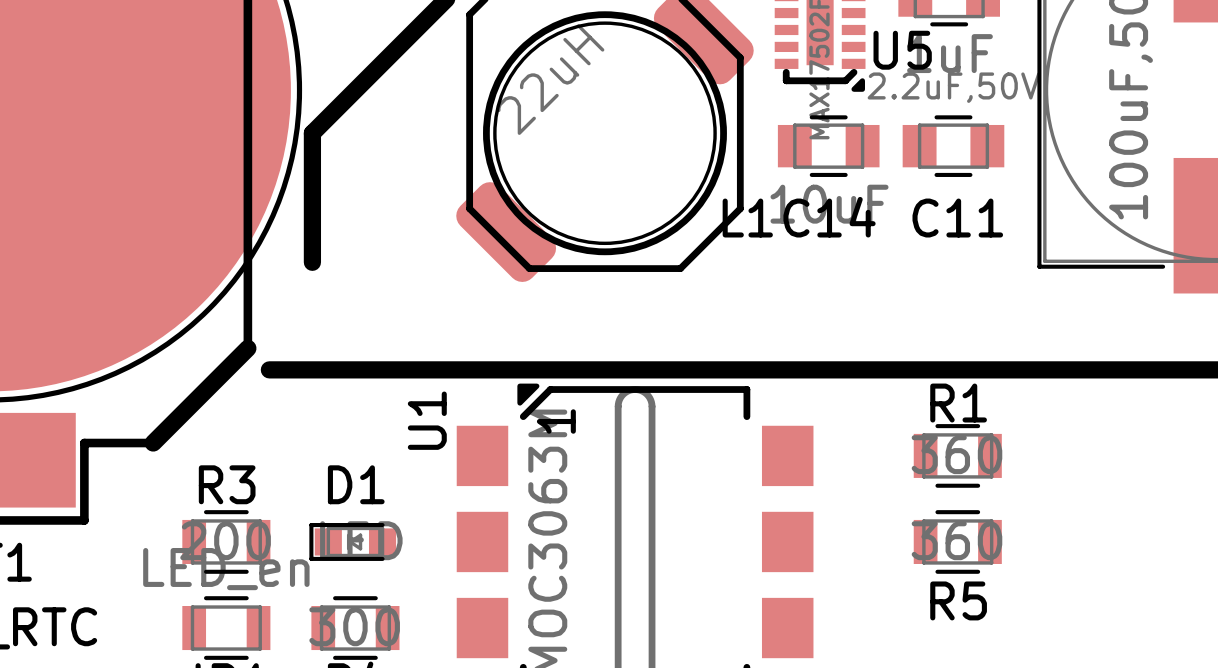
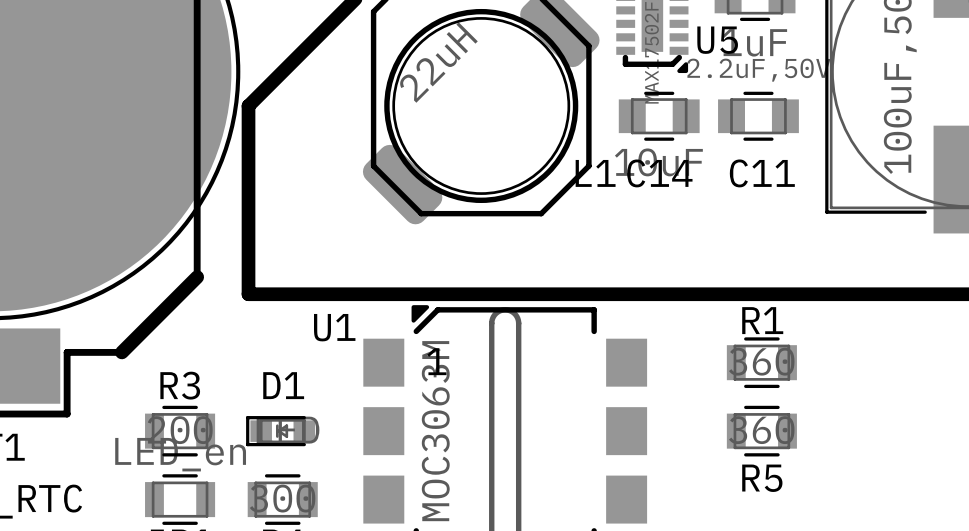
line: (269, 369) (312, 369) -> (248, 208) (248, 294)
U1 name rotation: 0° (427, 420) -> 90° clockwise (334, 327)
U1 text rotation: 0° (556, 421) -> 90° clockwise (436, 361)

